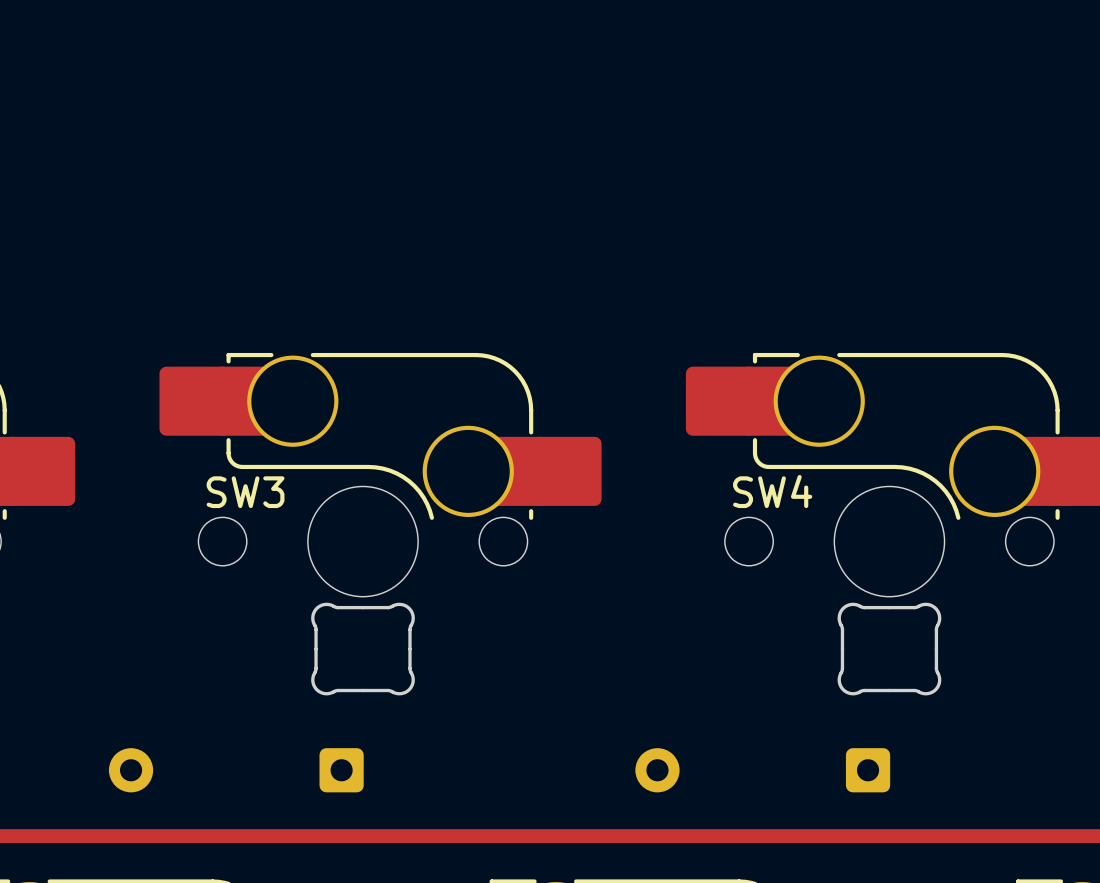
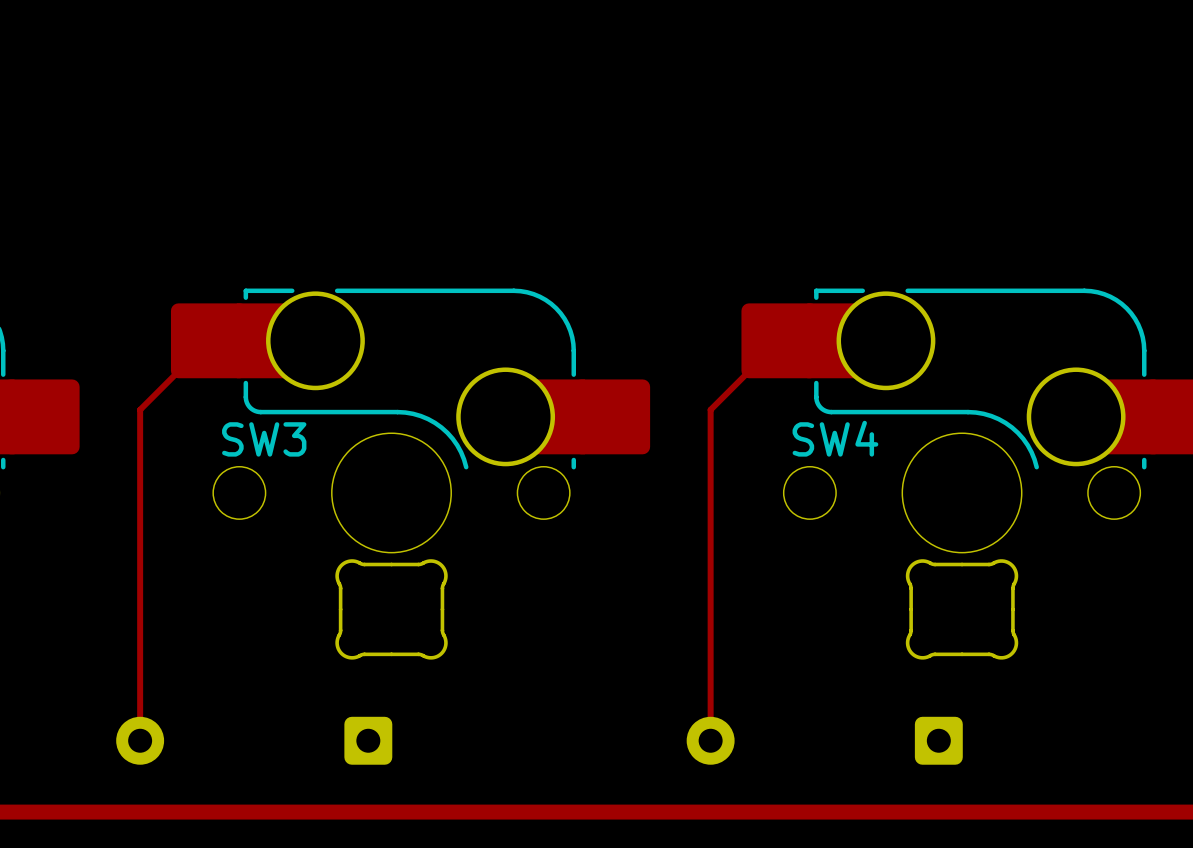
track: none -> (209, 340) (140, 409) (140, 740)
track: none -> (779, 340) (710, 409) (710, 740)

